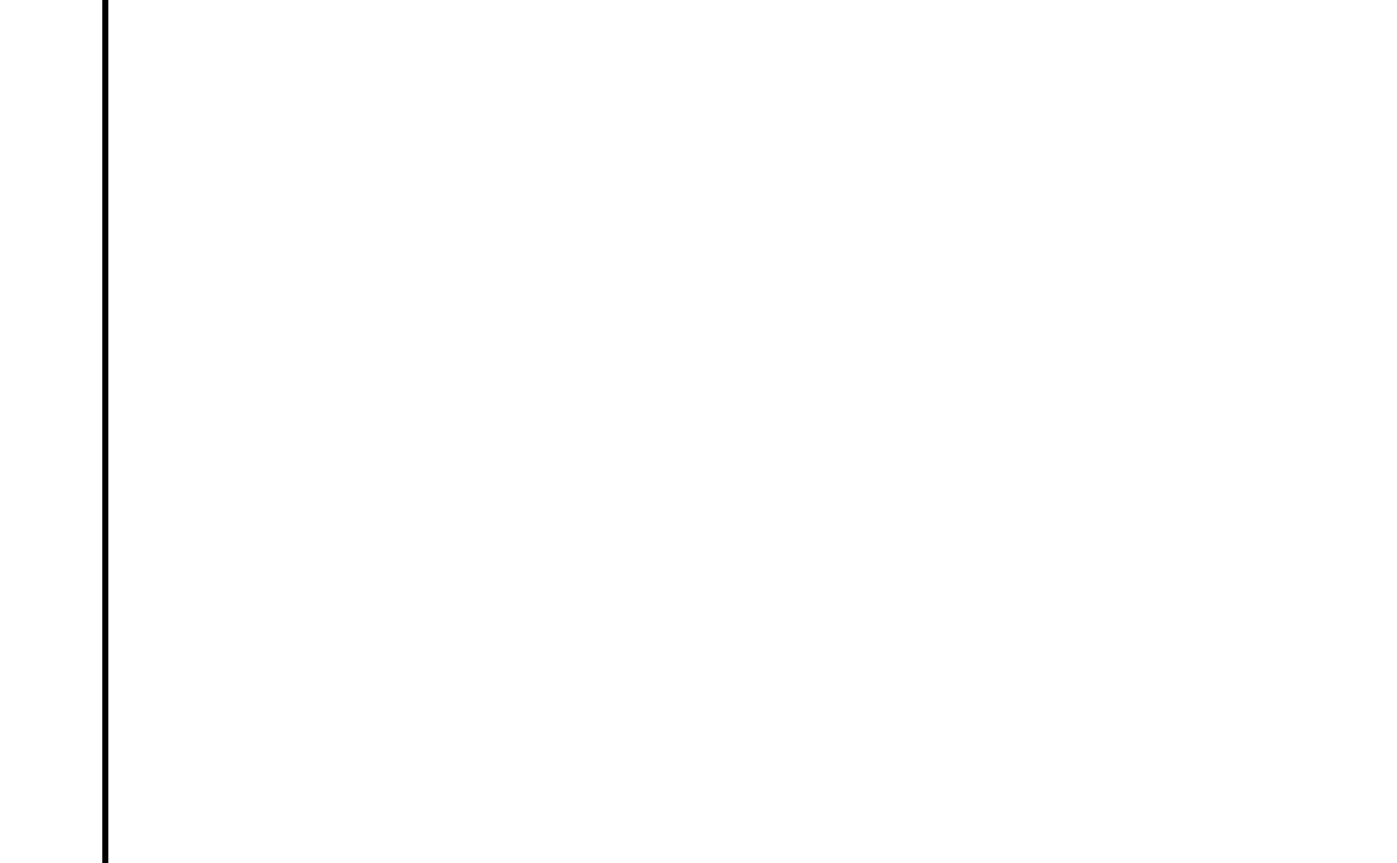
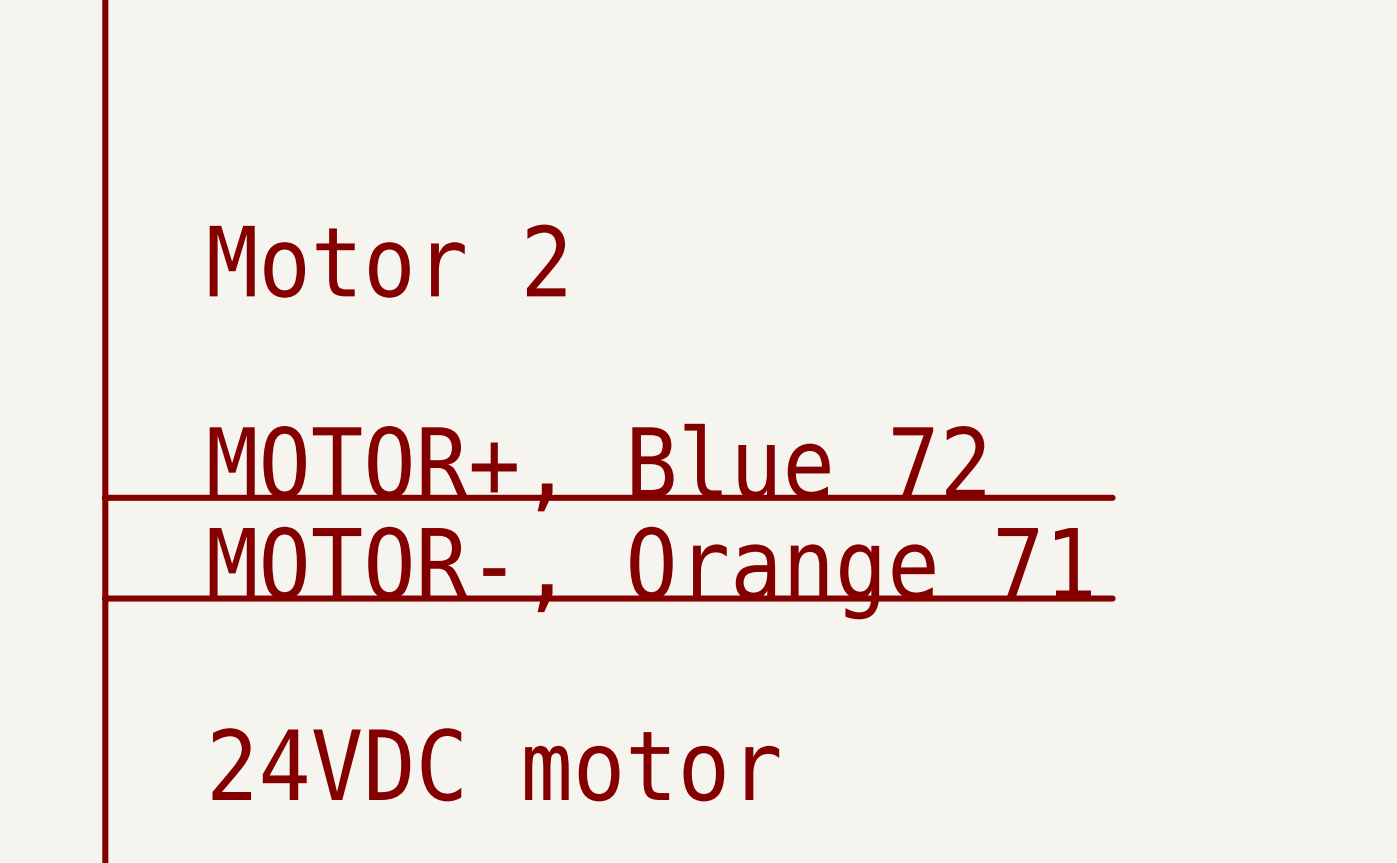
text: none -> Motor 2 (387, 261)
text: none -> MOTOR+, Blue 72 (597, 467)
line: none -> (105, 497) (1112, 497)
text: none -> MOTOR-, Orange 71 (650, 573)
line: none -> (105, 598) (1112, 598)
text: none -> 24VDC motor (495, 764)

